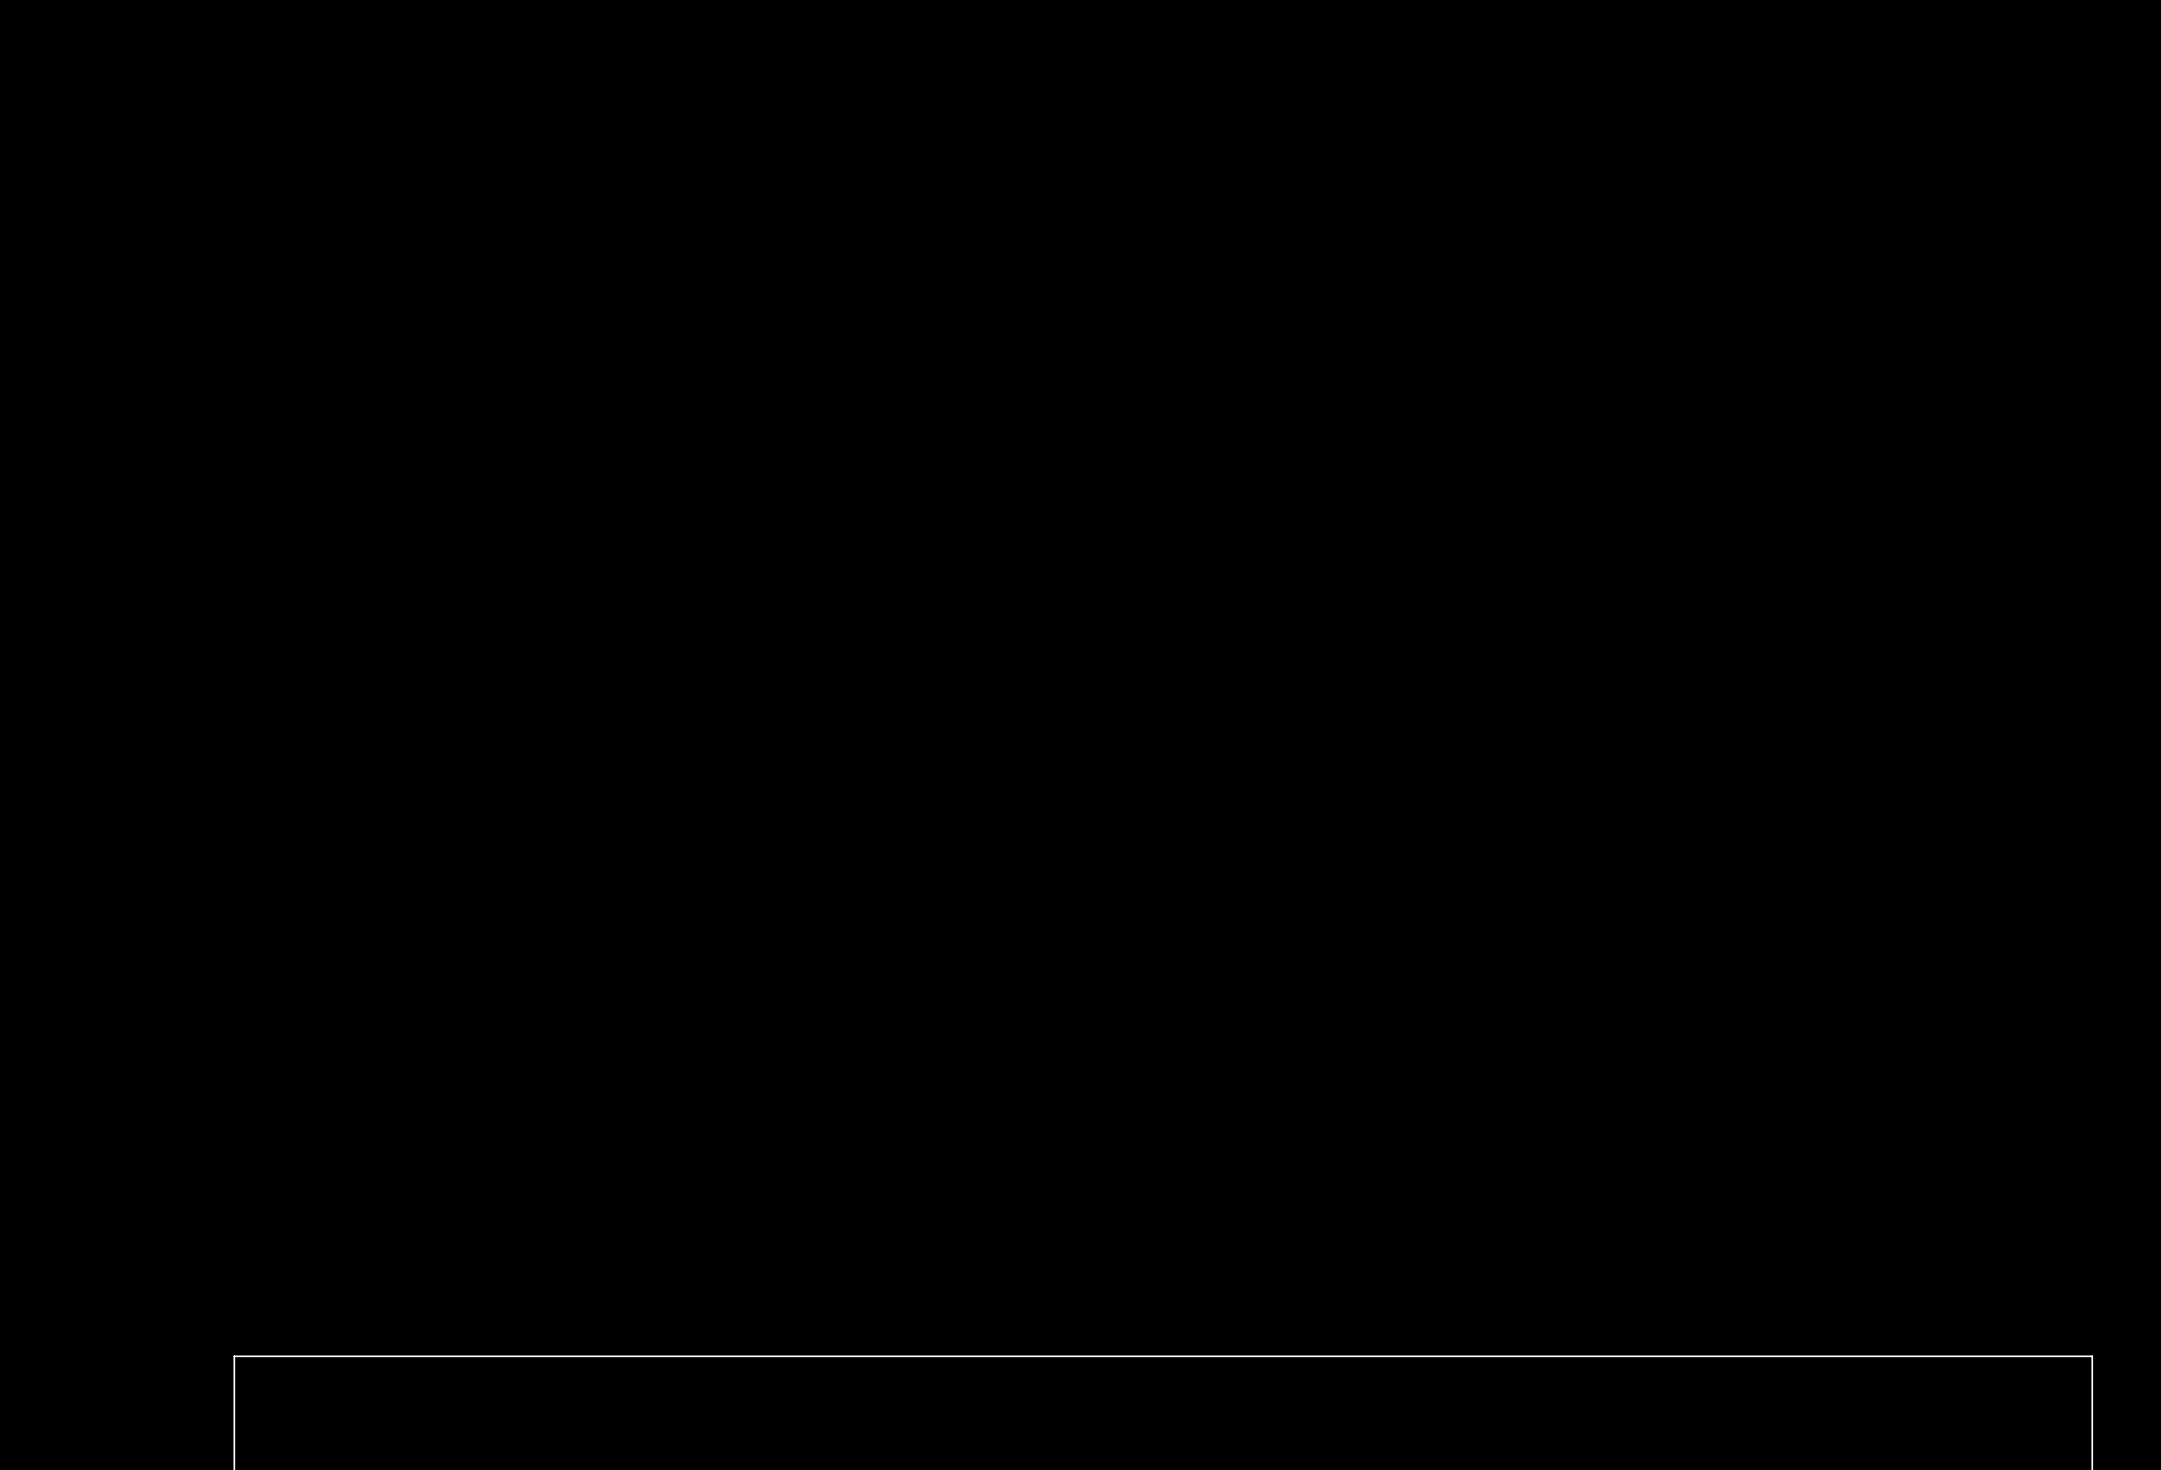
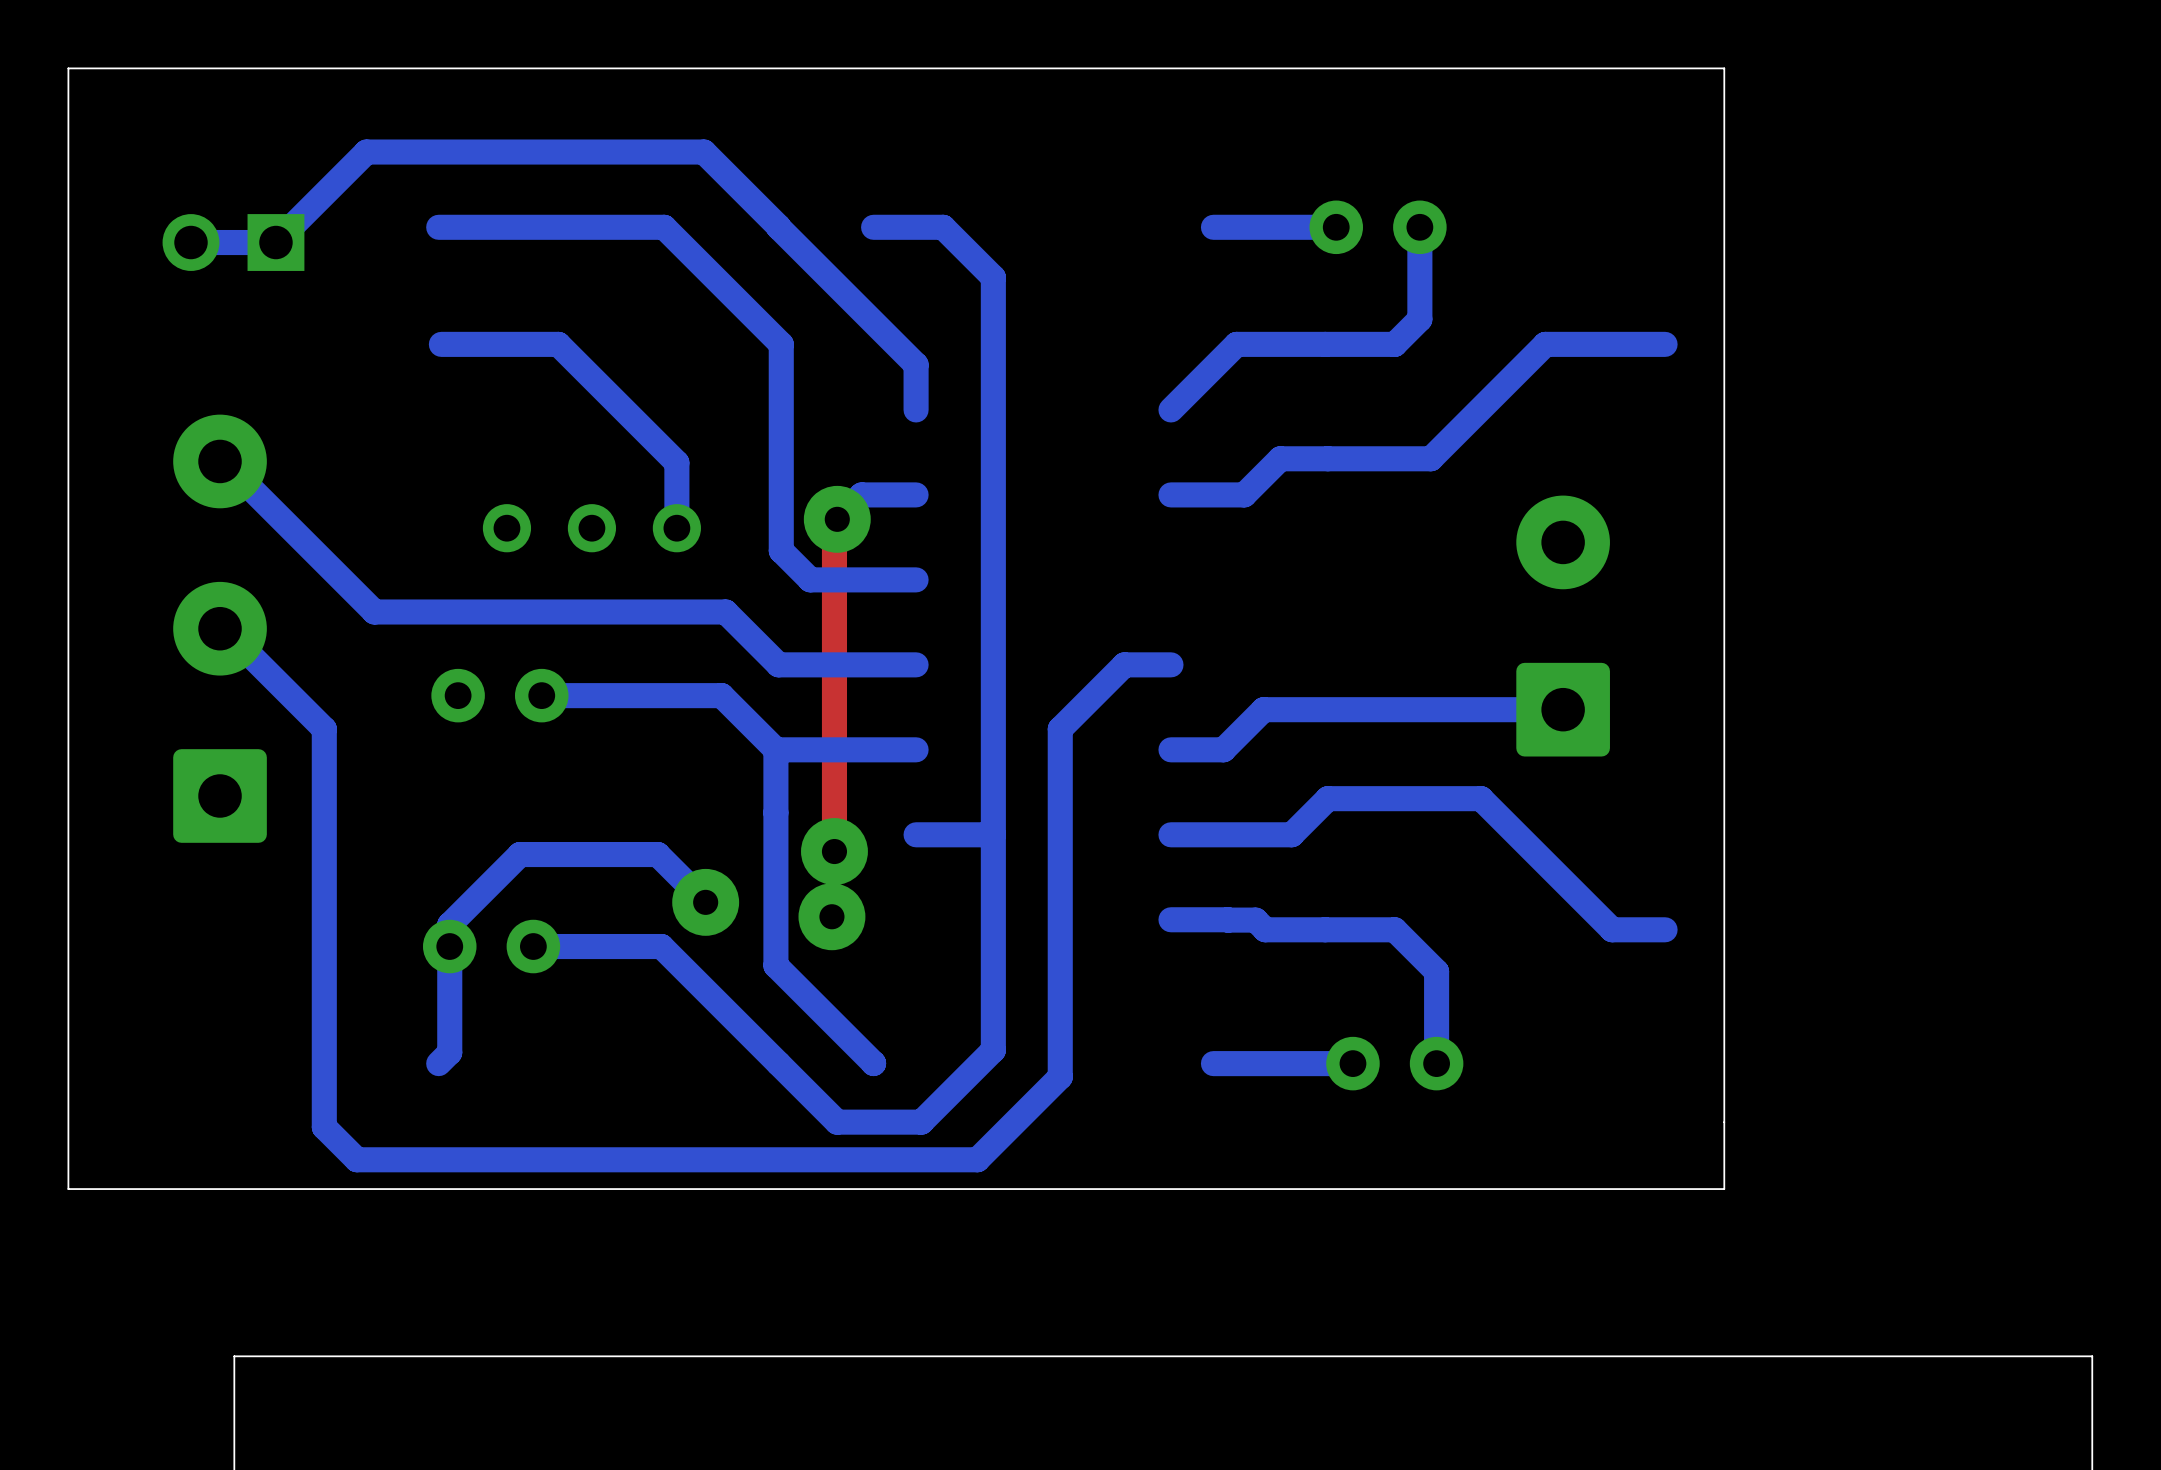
board edge: none -> (1724, 68) (68, 68) (68, 1189) (1724, 1189) (1724, 68)
bottom track: none -> (778, 226) (703, 152) (366, 152) (275, 242) (191, 242)
bottom track: none -> (438, 227) (664, 227) (781, 344) (781, 550) (810, 579) (916, 579)
bottom track: none -> (778, 227) (916, 364) (916, 409)
bottom track: none -> (873, 227) (943, 227) (993, 277) (993, 1050) (921, 1122) (837, 1122) (661, 946) (533, 946)
bottom track: none -> (1336, 227) (1213, 227)
part: none -> (1378, 227)
bottom track: none -> (1419, 227) (1419, 319) (1394, 344) (1236, 344) (1170, 409)
part: none -> (233, 242)
bottom track: none -> (441, 344) (558, 344) (676, 462) (676, 528)
bottom track: none -> (1665, 344) (1545, 344) (1430, 458) (1280, 458) (1244, 494) (1170, 494)
bottom track: none -> (223, 461) (374, 612) (725, 612) (778, 664) (916, 664)
bottom track: none -> (916, 494) (861, 494) (837, 519)
top track: none -> (837, 519) (834, 522) (834, 851)
via: none -> (837, 519)
part: none -> (591, 528)
part: none -> (1563, 626)
part: none -> (220, 628)
bottom track: none -> (223, 628) (324, 729) (324, 1127) (356, 1159) (977, 1159) (1060, 1076) (1060, 729) (1124, 664) (1170, 664)
part: none -> (499, 695)
bottom track: none -> (541, 695) (721, 695) (775, 749)
bottom track: none -> (1563, 709) (1263, 709) (1223, 749) (1170, 749)
bottom track: none -> (775, 749) (775, 965) (873, 1063)
bottom track: none -> (916, 749) (775, 749)
bottom track: none -> (993, 834) (916, 834)
bottom track: none -> (1170, 834) (1291, 834) (1327, 798) (1481, 798) (1612, 929) (1665, 929)
via: none -> (834, 851)
bottom track: none -> (705, 902) (657, 854) (520, 854) (449, 924) (449, 1052) (438, 1063)
via: none -> (705, 902)
via: none -> (831, 916)
bottom track: none -> (1227, 919) (1170, 919)
bottom track: none -> (1228, 920) (1255, 920) (1265, 929) (1394, 929) (1436, 971) (1436, 1063)
part: none -> (491, 946)
bottom track: none -> (1352, 1063) (1213, 1063)
part: none -> (1394, 1063)

